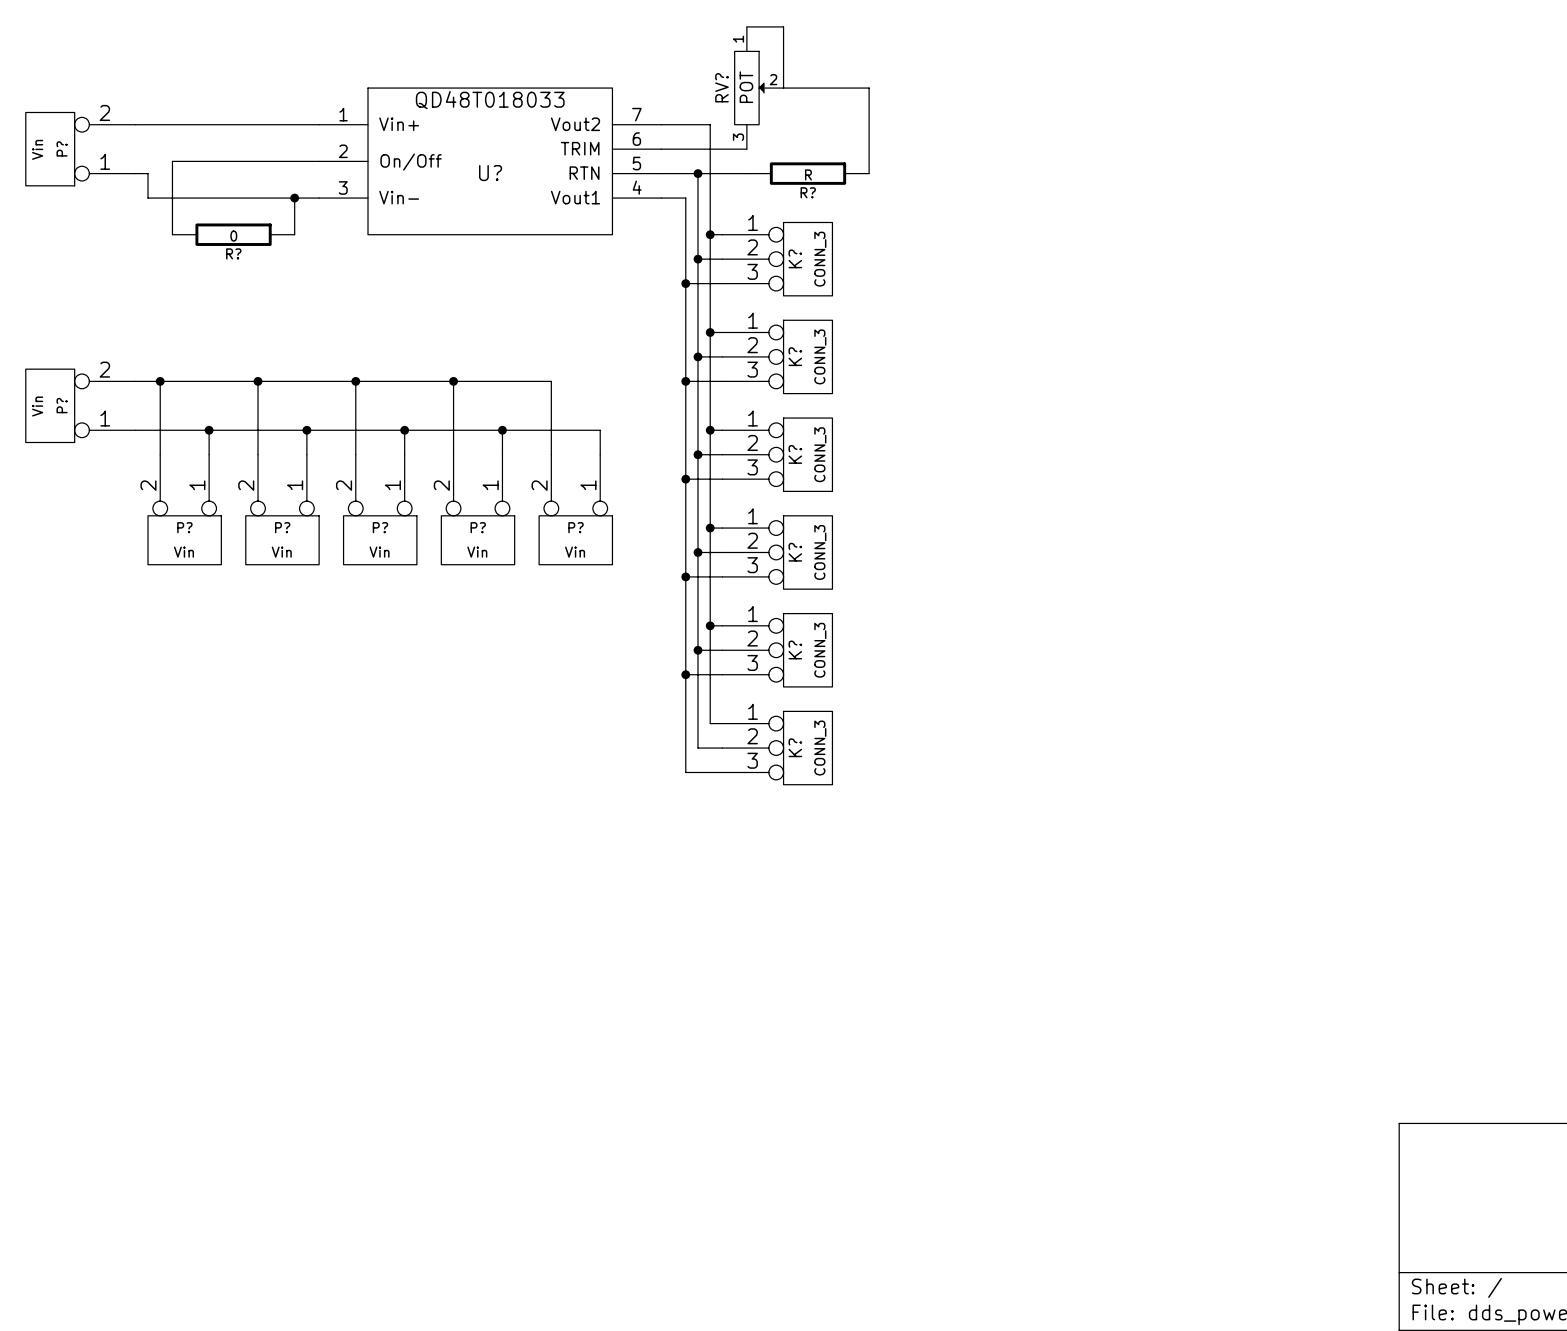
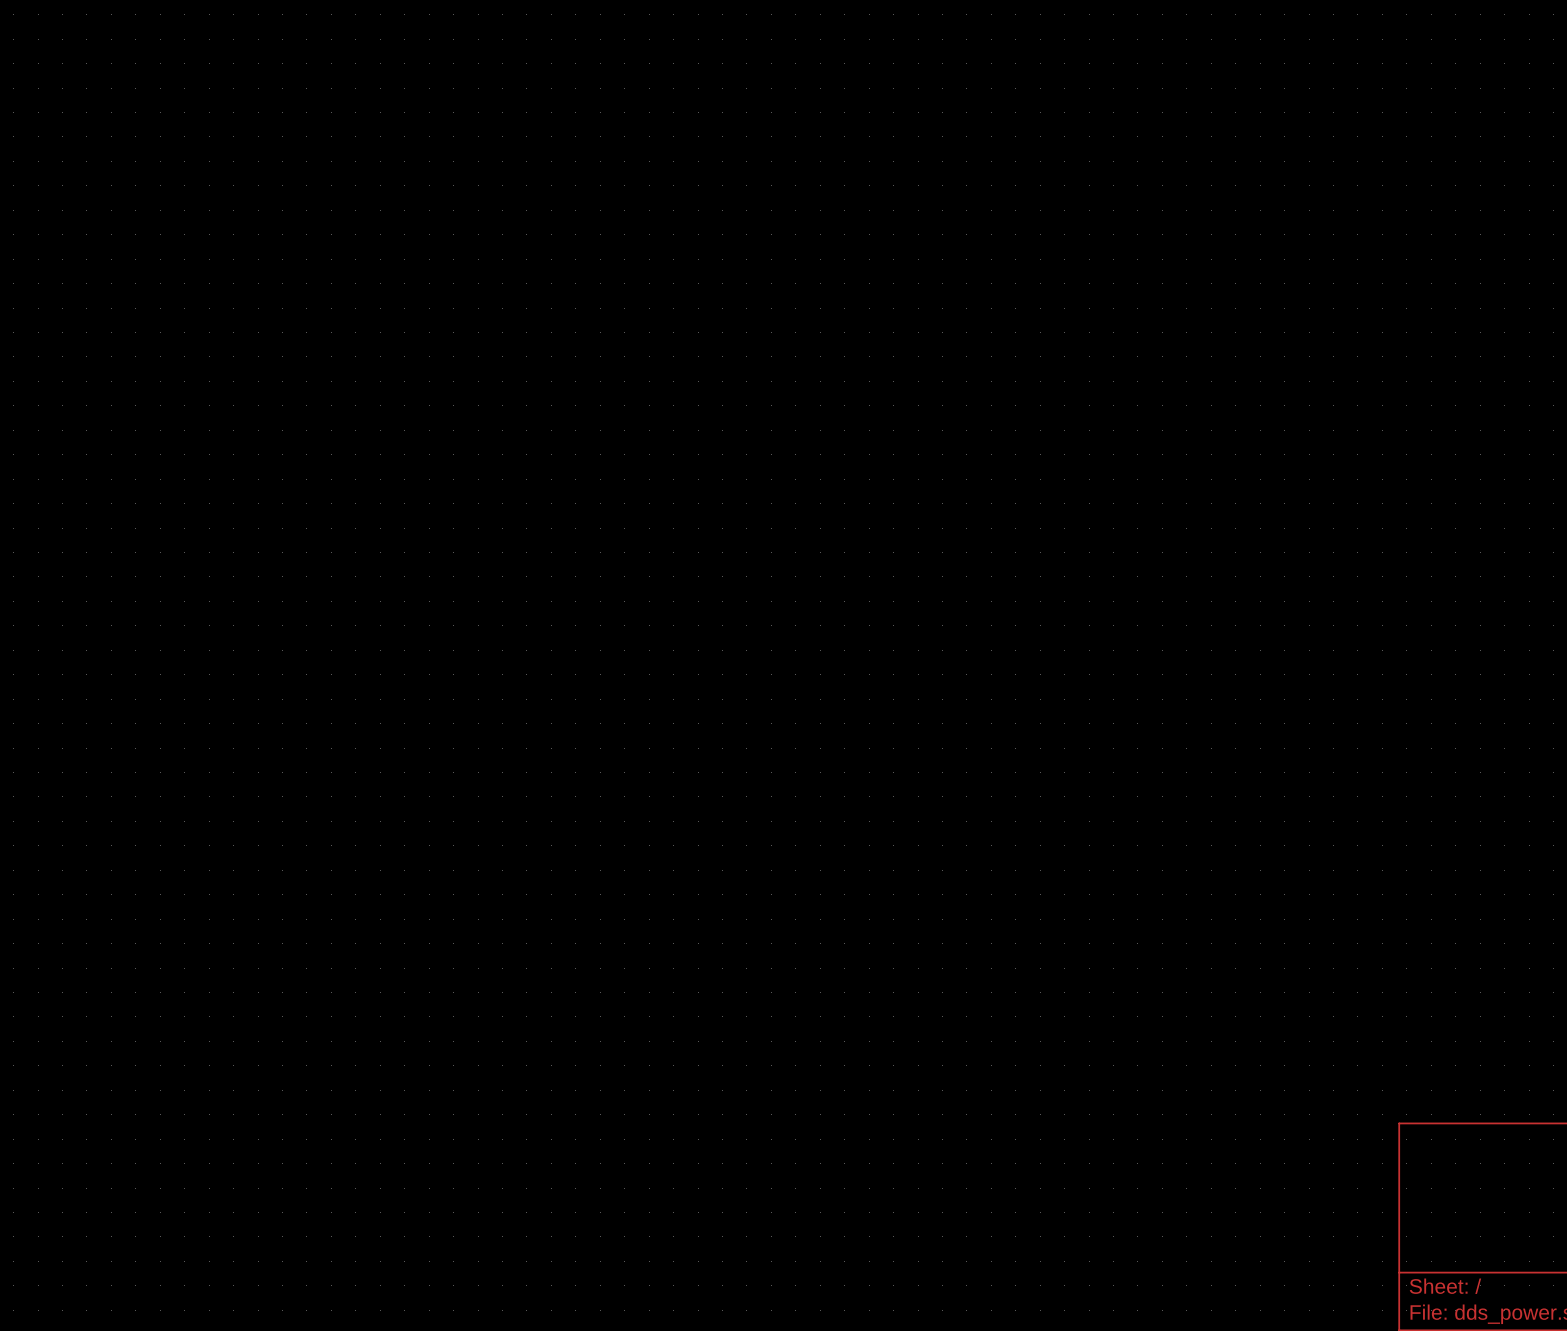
wire: (746, 26) (783, 26) (783, 88) (869, 88) (869, 173) -> none
RV?: POT (759, 88) -> none
wire: (135, 124) (319, 124) -> none
wire: (661, 124) (710, 124) (710, 723) (722, 723) -> none
P?: Vin (80, 149) -> none
wire: (661, 149) (746, 149) -> none
wire: (319, 161) (172, 161) (172, 234) -> none
U?: QD48T018033 (490, 161) -> none
wire: (135, 173) (148, 173) (148, 198) (319, 198) -> none
wire: (661, 173) (746, 173) -> none
wire: (698, 173) (698, 748) (722, 748) -> none
junction: (698, 173) -> none
R?: R (808, 173) -> none
wire: (294, 198) (294, 234) -> none
junction: (294, 198) -> none
wire: (661, 198) (685, 198) (685, 772) (722, 772) -> none
R?: 0 (233, 234) -> none
wire: (710, 234) (722, 234) -> none
junction: (710, 234) -> none
wire: (698, 259) (722, 259) -> none
junction: (698, 259) -> none
K?: CONN_3 (777, 259) -> none
wire: (685, 283) (722, 283) -> none
junction: (685, 283) -> none
wire: (710, 332) (722, 332) -> none
junction: (710, 332) -> none
wire: (698, 356) (722, 356) -> none
junction: (698, 356) -> none
K?: CONN_3 (777, 356) -> none
wire: (135, 381) (551, 381) (551, 454) -> none
wire: (160, 381) (160, 454) -> none
junction: (160, 381) -> none
wire: (258, 381) (258, 454) -> none
junction: (258, 381) -> none
wire: (355, 381) (355, 454) -> none
junction: (355, 381) -> none
wire: (453, 381) (453, 454) -> none
junction: (453, 381) -> none
wire: (685, 381) (722, 381) -> none
junction: (685, 381) -> none
P?: Vin (80, 405) -> none
wire: (135, 430) (600, 430) (600, 454) -> none
wire: (209, 430) (209, 454) -> none
junction: (209, 430) -> none
wire: (306, 430) (306, 454) -> none
junction: (306, 430) -> none
wire: (404, 430) (404, 454) -> none
junction: (404, 430) -> none
wire: (502, 430) (502, 454) -> none
junction: (502, 430) -> none
wire: (710, 430) (722, 430) -> none
junction: (710, 430) -> none
wire: (698, 454) (722, 454) -> none
junction: (698, 454) -> none
K?: CONN_3 (777, 454) -> none
wire: (685, 479) (722, 479) -> none
junction: (685, 479) -> none
P?: Vin (184, 509) -> none
P?: Vin (282, 509) -> none
P?: Vin (380, 509) -> none
P?: Vin (478, 509) -> none
P?: Vin (575, 509) -> none
wire: (710, 528) (722, 528) -> none
junction: (710, 528) -> none
wire: (698, 552) (722, 552) -> none
junction: (698, 552) -> none
K?: CONN_3 (777, 552) -> none
wire: (685, 576) (722, 576) -> none
junction: (685, 576) -> none
wire: (710, 625) (722, 625) -> none
junction: (710, 625) -> none
wire: (698, 650) (722, 650) -> none
junction: (698, 650) -> none
K?: CONN_3 (777, 650) -> none
wire: (685, 674) (722, 674) -> none
junction: (685, 674) -> none
K?: CONN_3 (777, 748) -> none

